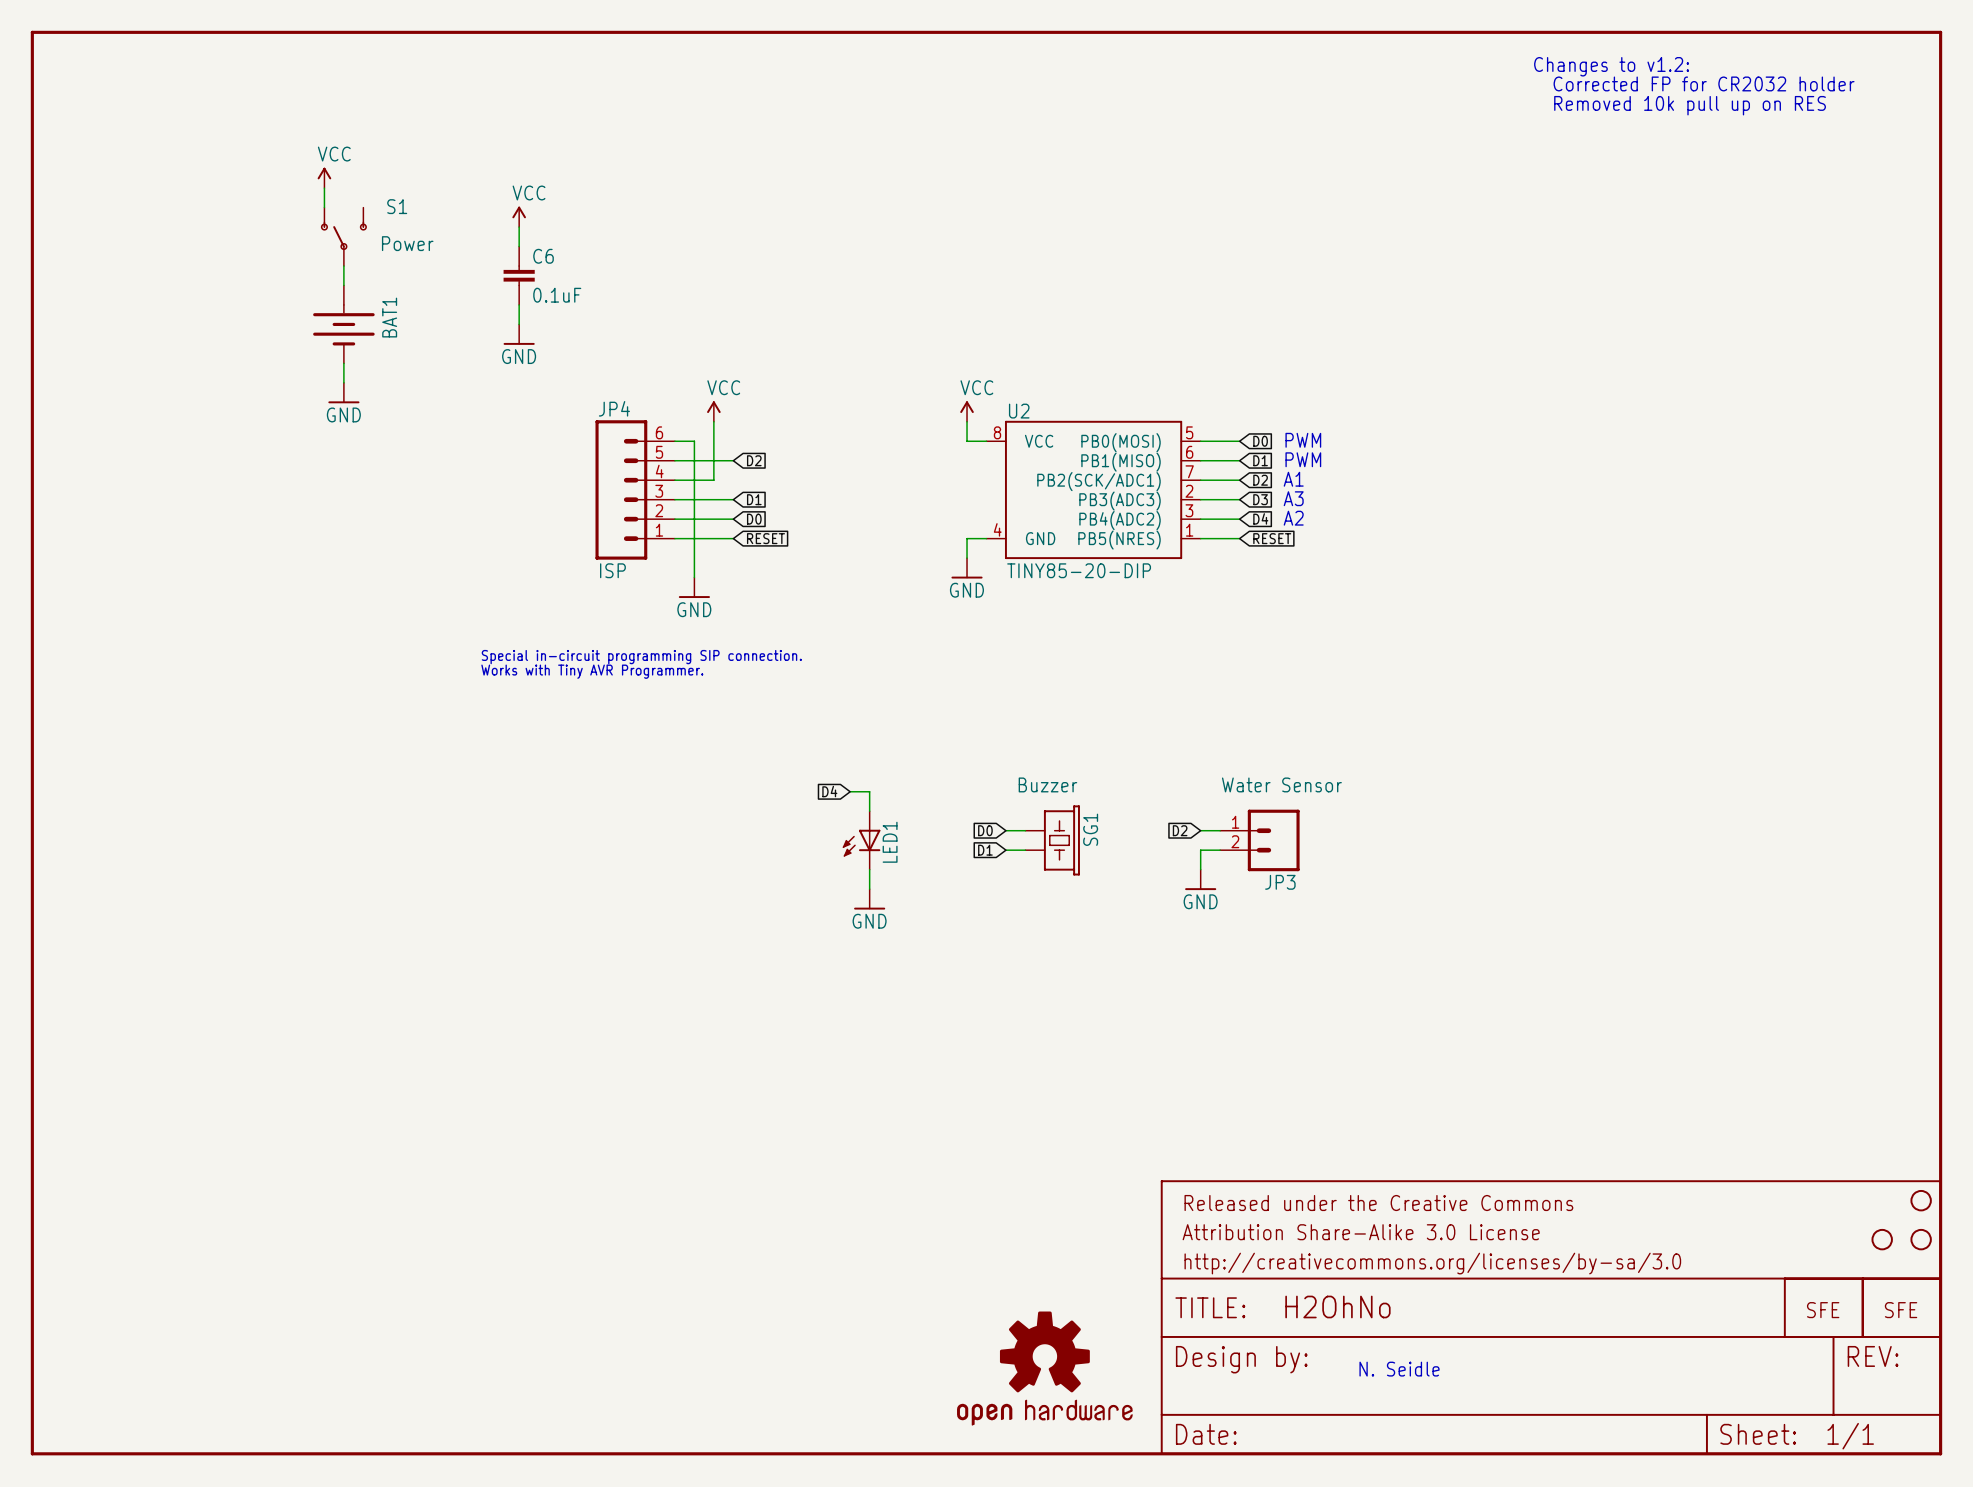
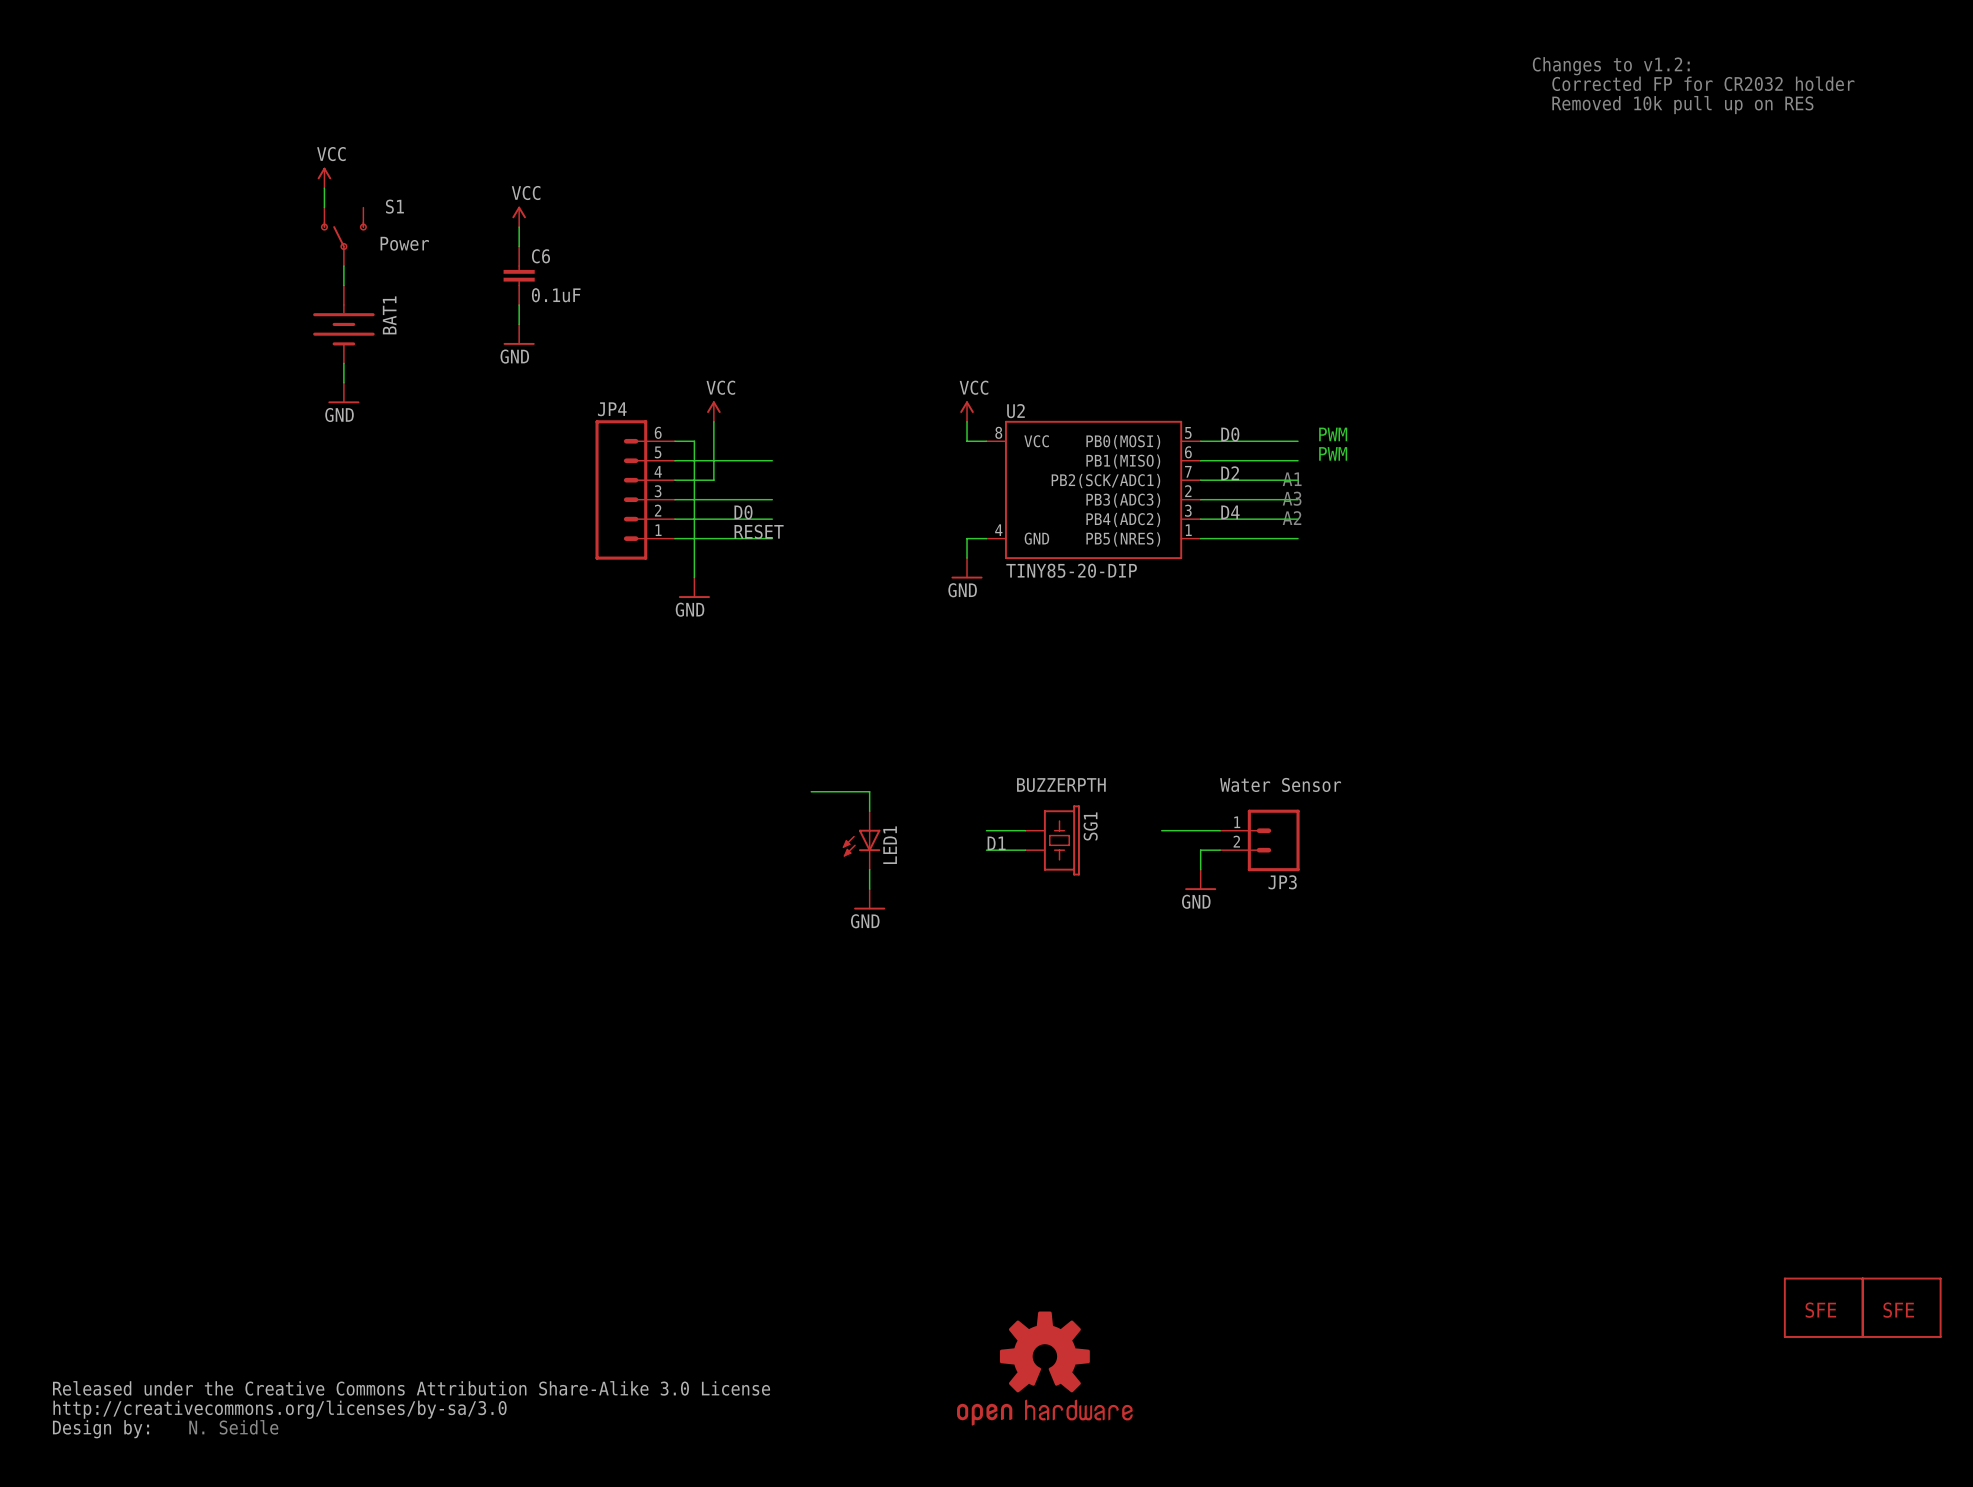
label: none -> D0 (1230, 434)
text: none -> PWM (1333, 434)
text: PWM (1303, 440) -> none
wire: none -> (1239, 441) (1298, 441)
global label: D0 (1260, 441) -> none
text: none -> PWM (1333, 453)
text: PWM (1303, 459) -> none
wire: none -> (733, 460) (772, 460)
global label: D2 (754, 460) -> none
wire: none -> (1239, 460) (1298, 460)
global label: D1 (1260, 460) -> none
label: none -> D2 (1230, 473)
wire: none -> (1239, 480) (1298, 480)
global label: D2 (1260, 480) -> none
wire: none -> (733, 499) (772, 499)
global label: D1 (754, 499) -> none
wire: none -> (1239, 499) (1298, 499)
global label: D3 (1260, 499) -> none
label: none -> D0 (743, 512)
label: none -> D4 (1230, 512)
global label: D4 (1260, 518) -> none
wire: none -> (733, 519) (772, 519)
global label: D0 (754, 519) -> none
wire: none -> (1239, 519) (1298, 519)
label: none -> RESET (759, 531)
wire: none -> (733, 538) (772, 538)
global label: RESET (765, 538) -> none
wire: none -> (1239, 538) (1298, 538)
global label: RESET (1272, 538) -> none
JP4 value: ISP (612, 570) -> none
text: Special in-circuit programming SIP connection. (641, 657) -> none
text: Works with Tiny AVR Programmer. (592, 671) -> none
part: (986, 743) -> none
SG1 value: Buzzer (1047, 784) -> BUZZERPTH (1061, 785)
wire: none -> (811, 791) (850, 791)
global label: D4 (829, 791) -> none
global label: D0 (985, 830) -> none
wire: none -> (986, 830) (1005, 830)
wire: none -> (1161, 830) (1200, 830)
global label: D2 (1180, 830) -> none
label: none -> D1 (996, 843)
global label: D1 (985, 850) -> none
wire: none -> (986, 850) (1005, 850)
part: (1921, 1200) -> none
part: (1882, 1239) -> none
part: (1921, 1239) -> none
part: (1551, 1317) -> none
text: N. Seidle (1399, 1369) -> none
part: none -> (411, 1409)
text: none -> N. Seidle (233, 1427)

